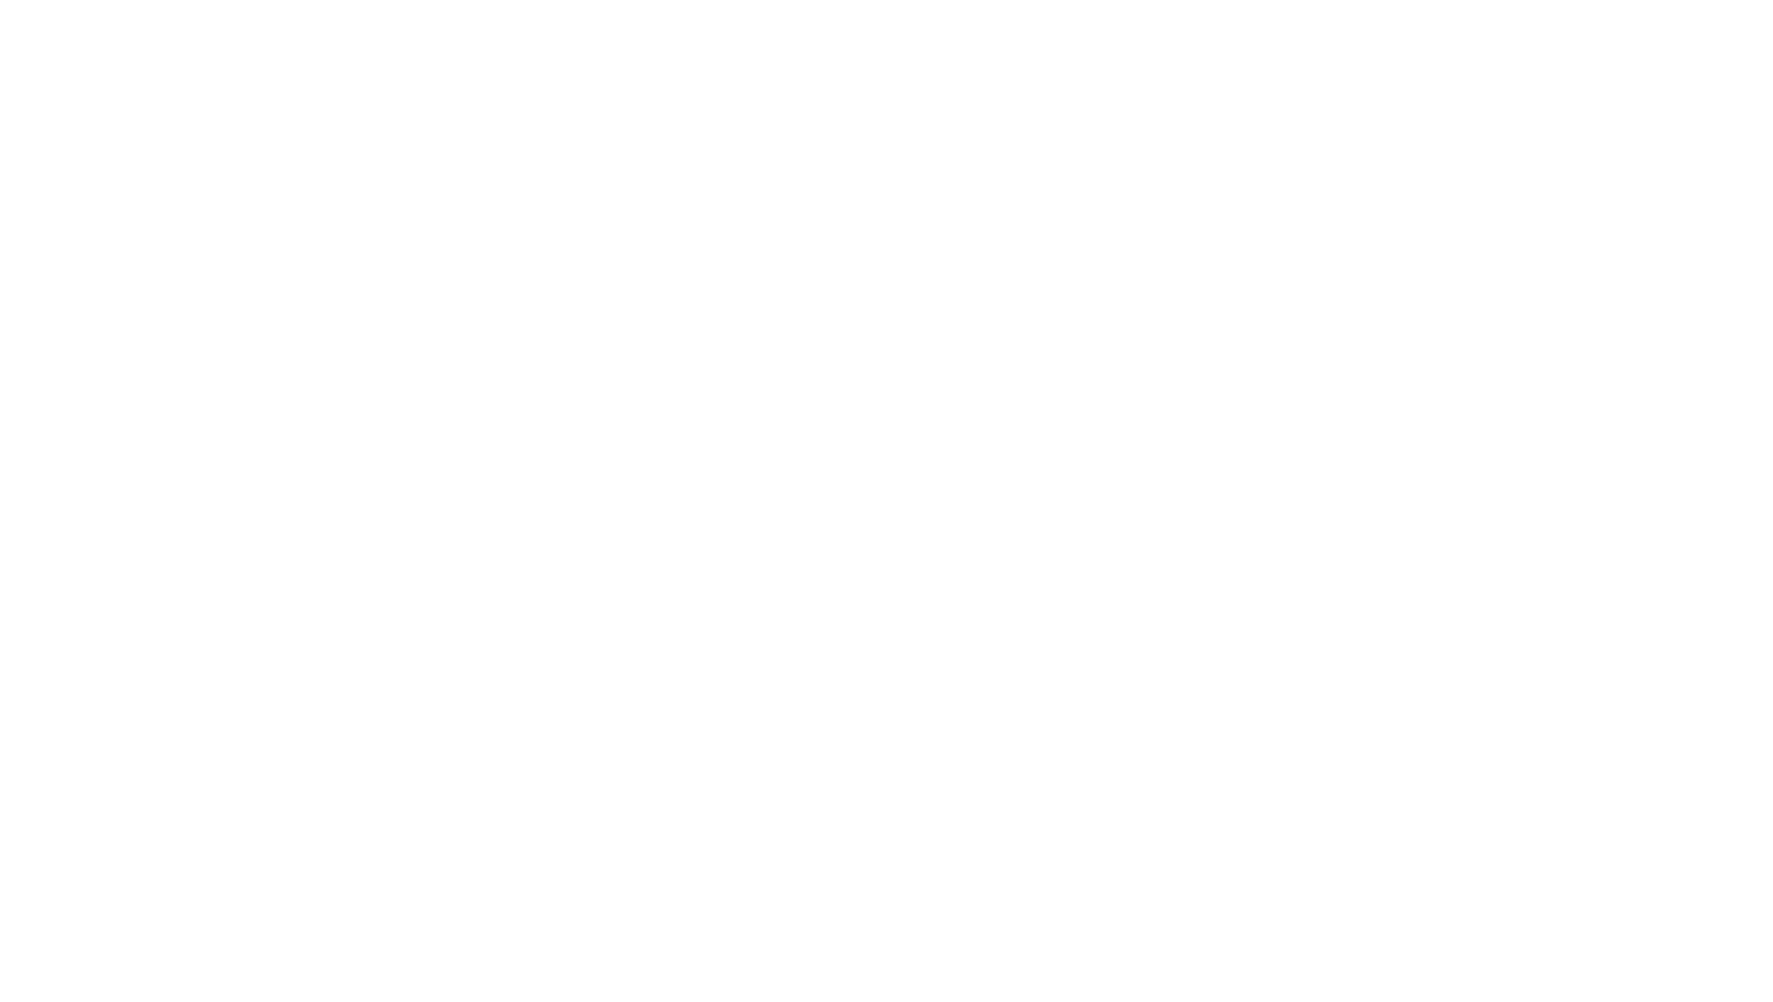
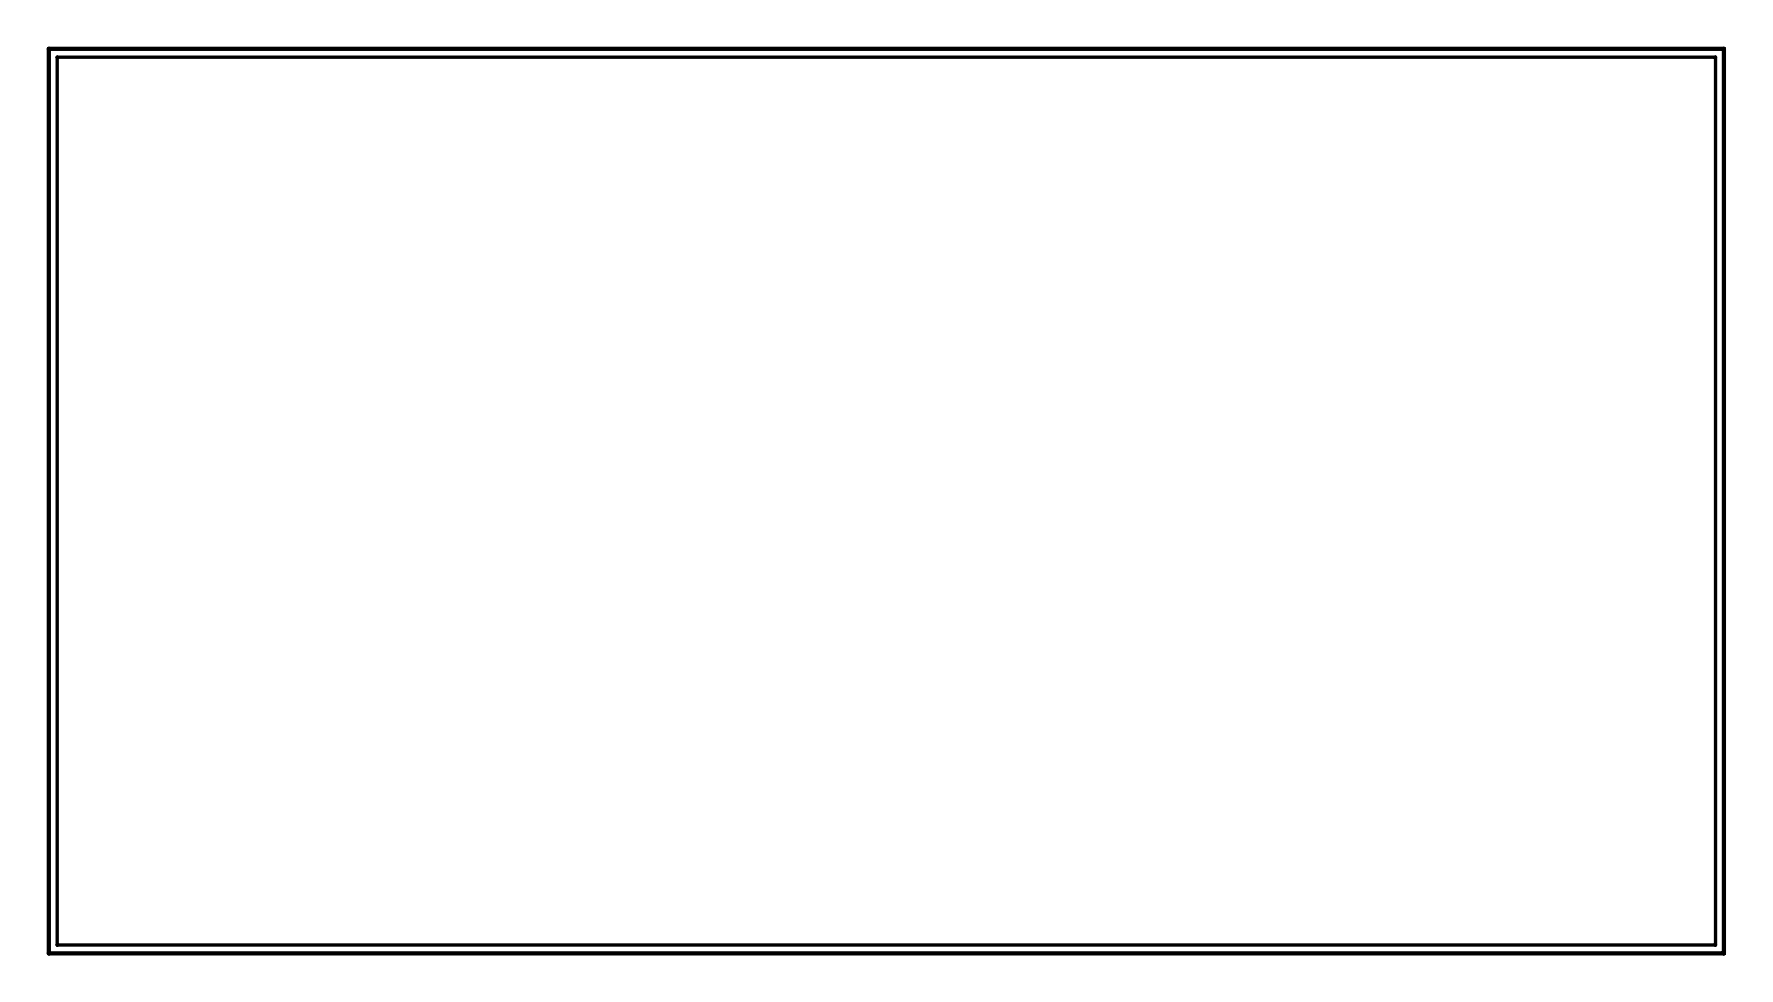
board edge: none -> (1723, 48) (48, 48) (48, 953) (1723, 953) (1723, 48)
line: none -> (1715, 57) (57, 57) (57, 944) (1715, 944) (1715, 57)

